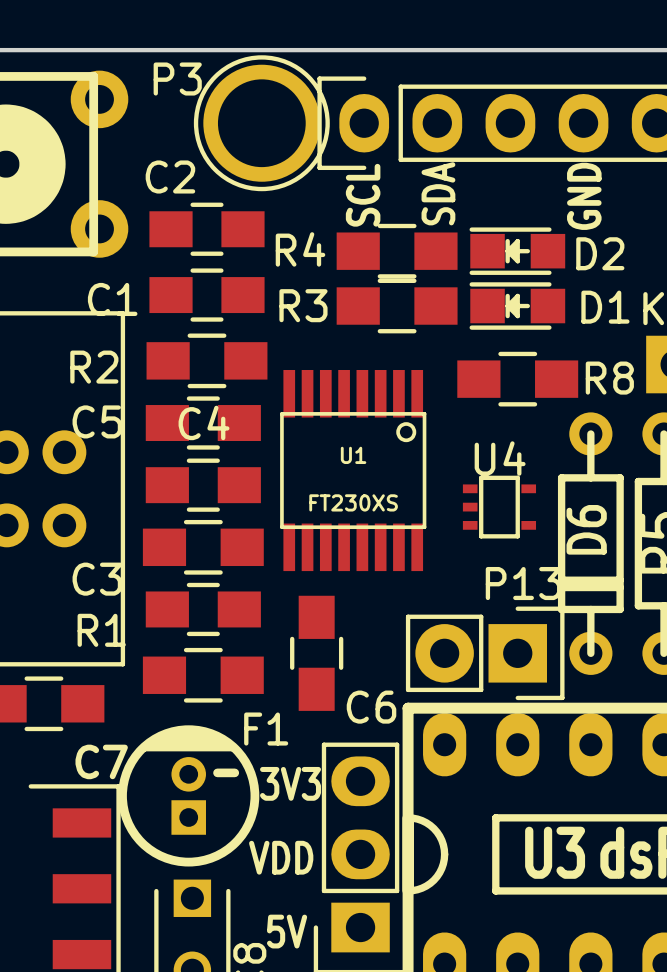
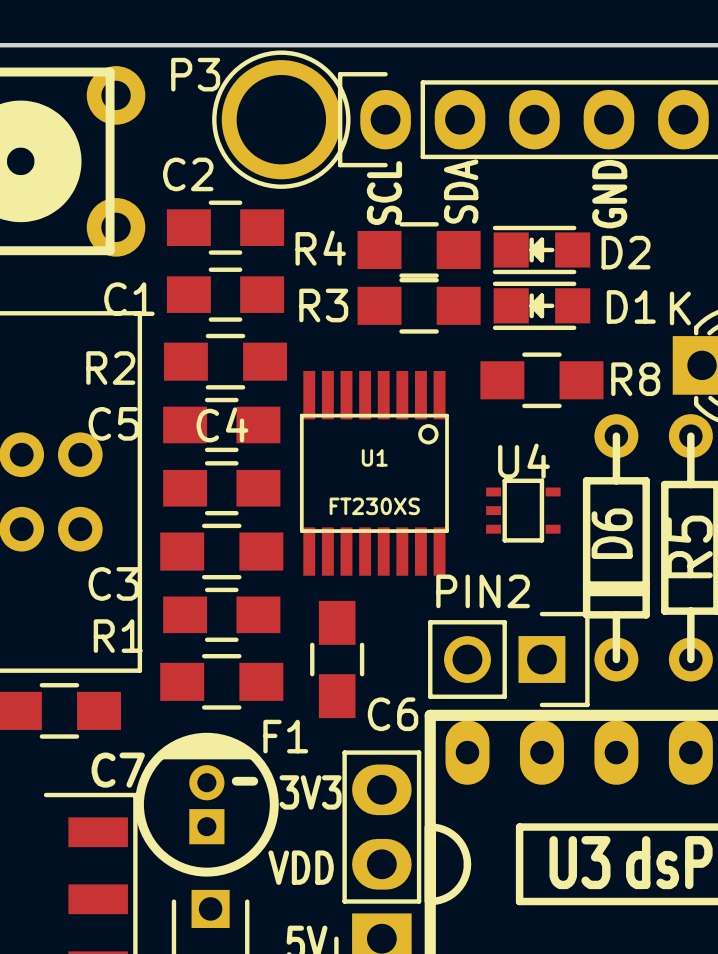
P13: (485, 653) -> none
part: none -> PIN2 (508, 659)

